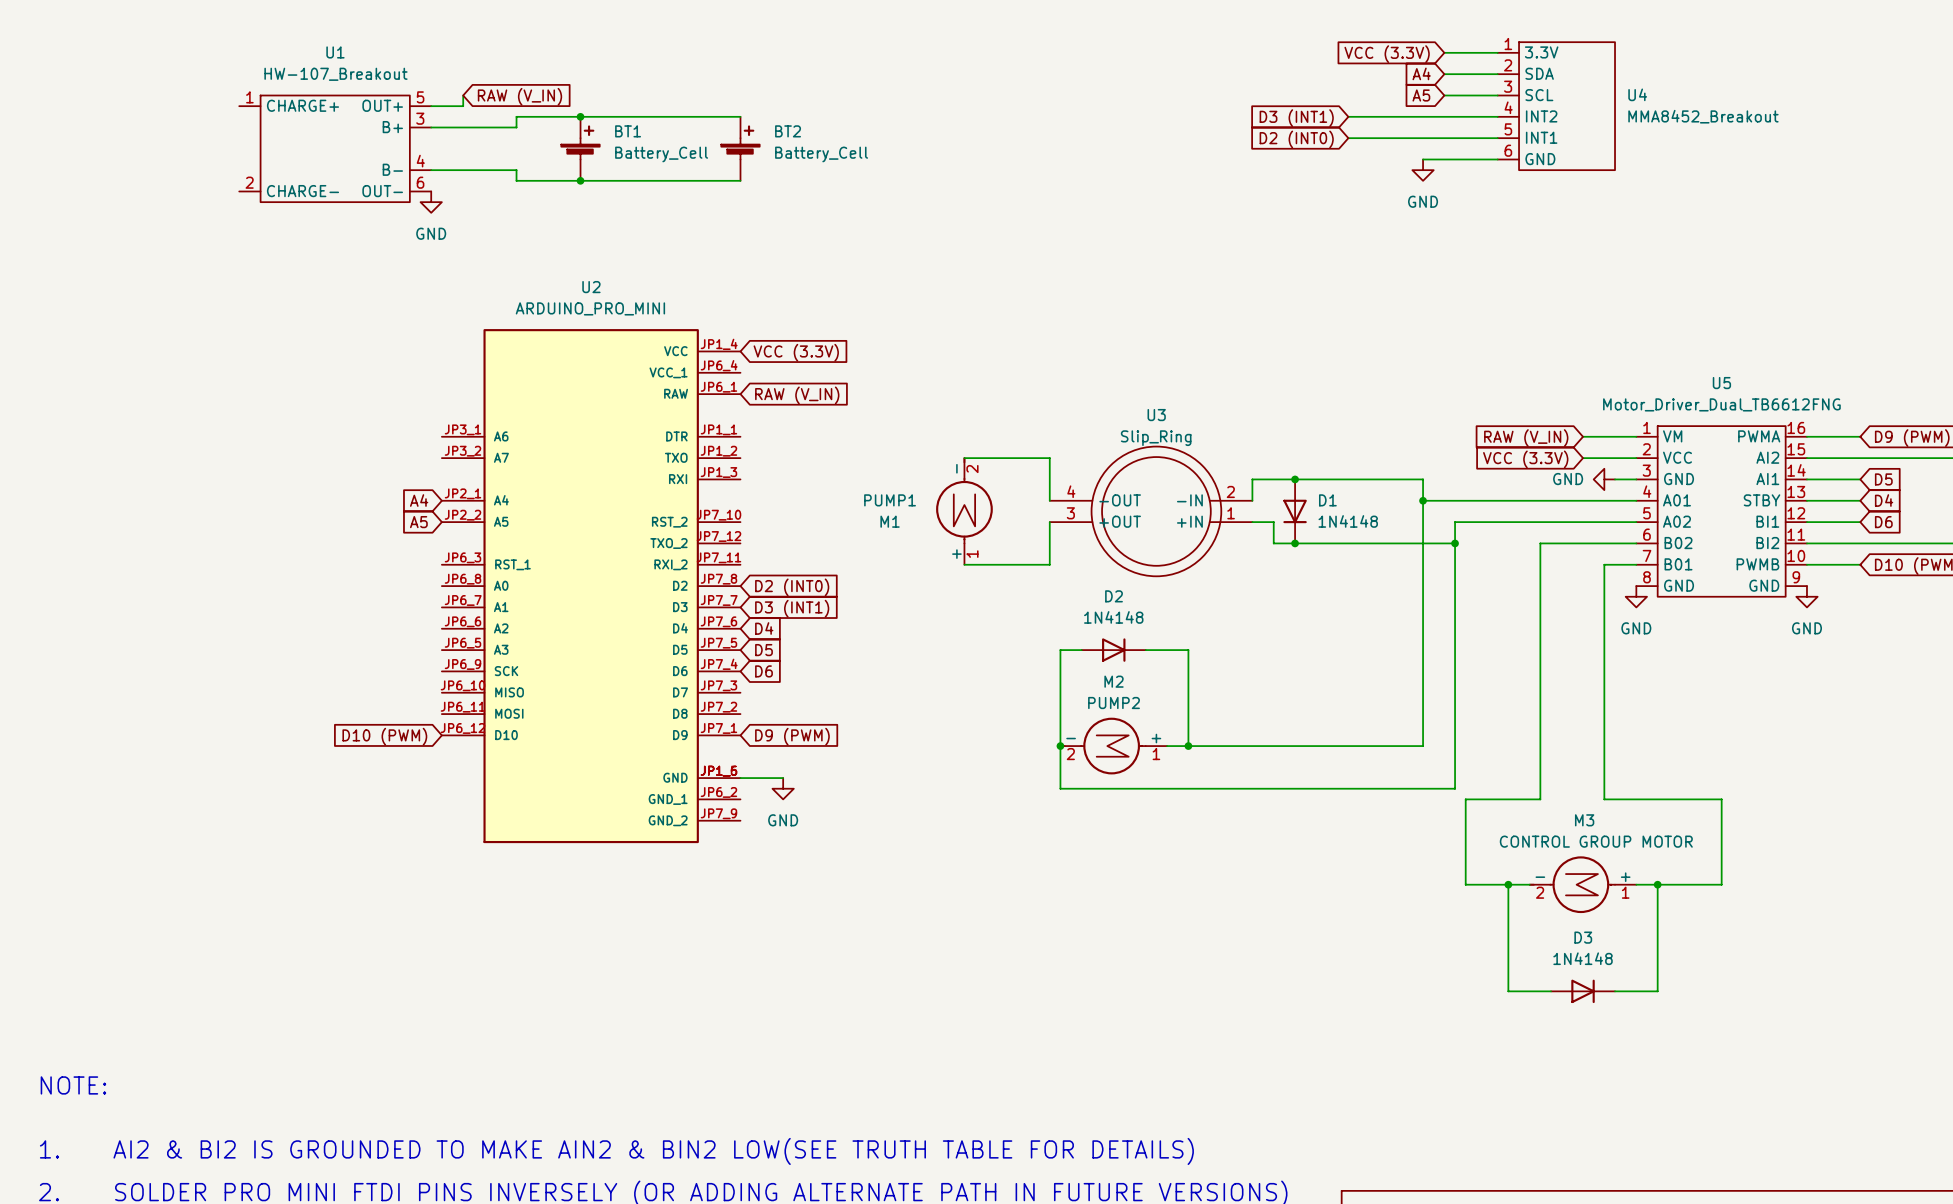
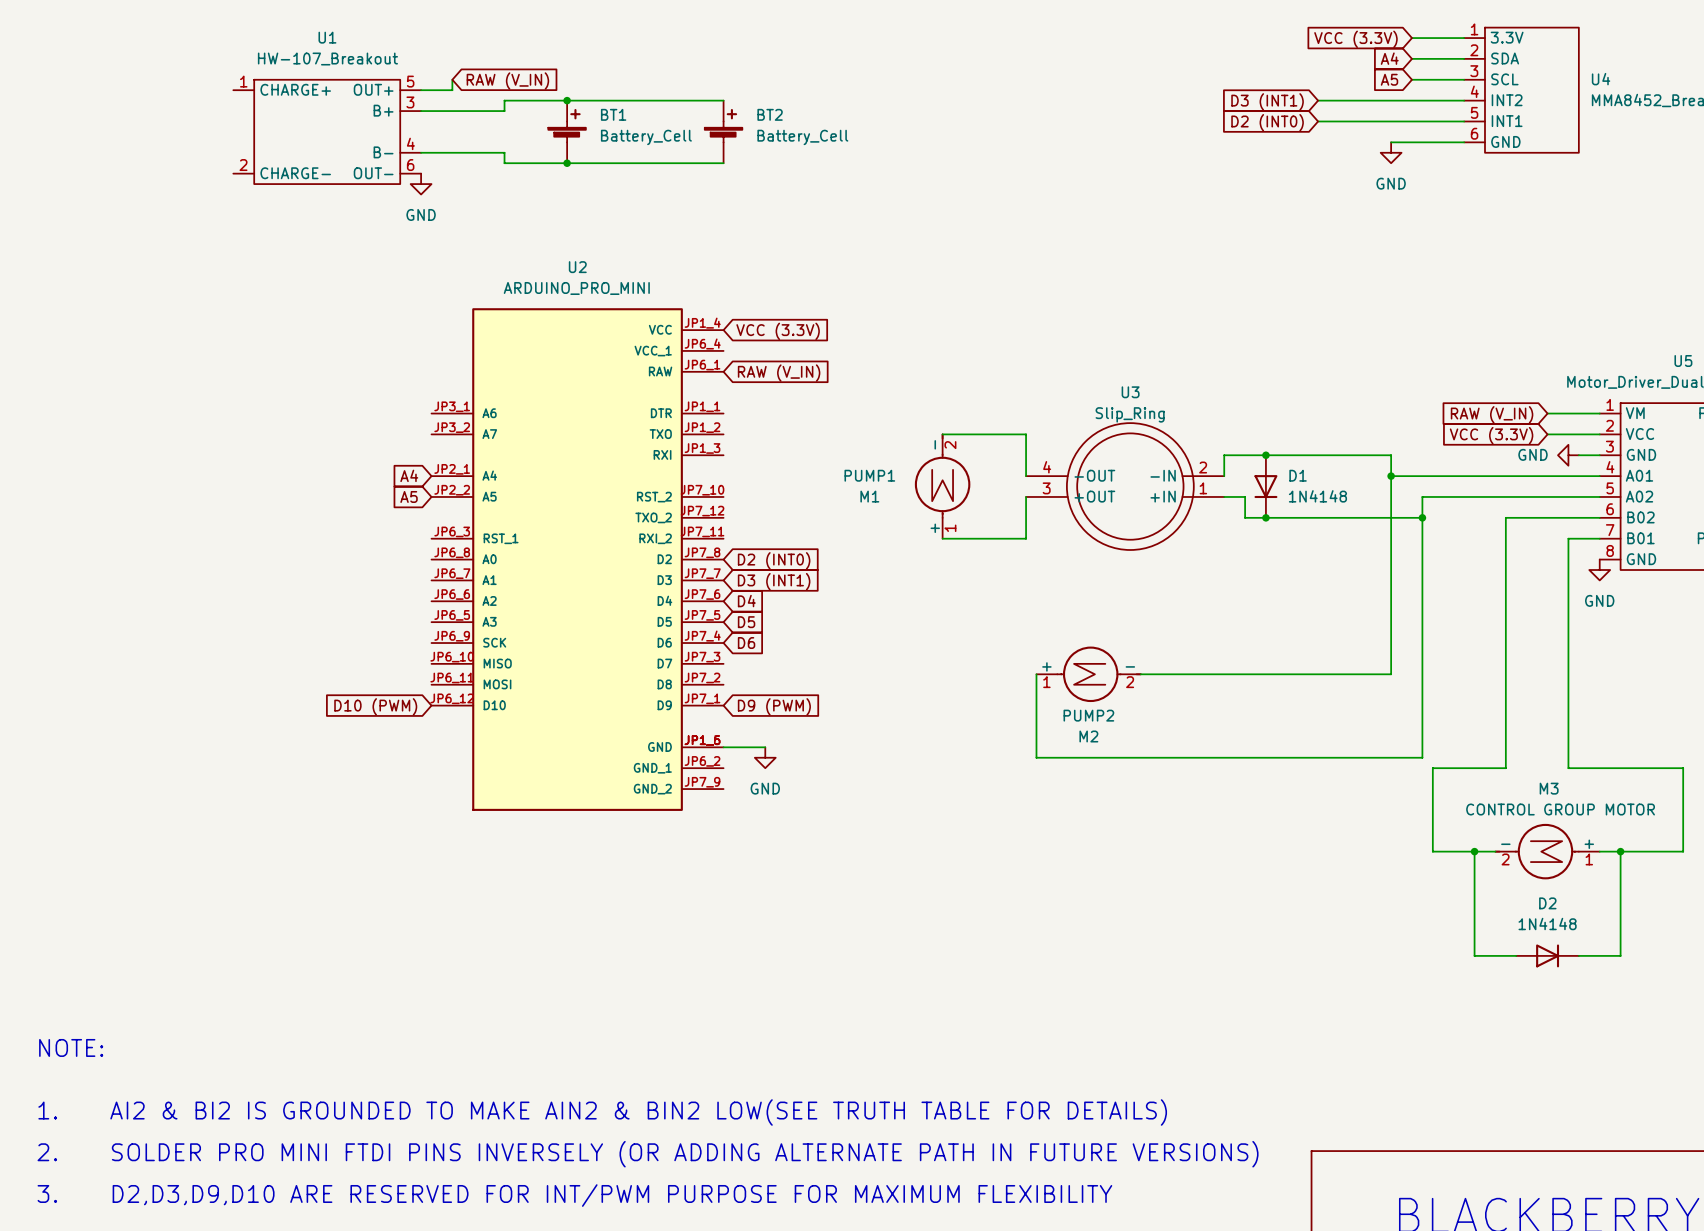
wire: (1081, 650) (1060, 650) (1060, 703) -> none
D2: 1N4148 (1113, 650) -> none
wire: (1145, 650) (1188, 650) (1188, 746) -> none
wire: (1423, 703) (1423, 746) (1167, 746) -> (1391, 674) (1140, 674)
junction: (1060, 746) -> none
M2 rotation: 0° (1103, 746) -> 180° (1099, 674)
junction: (1188, 746) -> none
D3 name: D3 (1583, 937) -> D2 (1547, 903)

